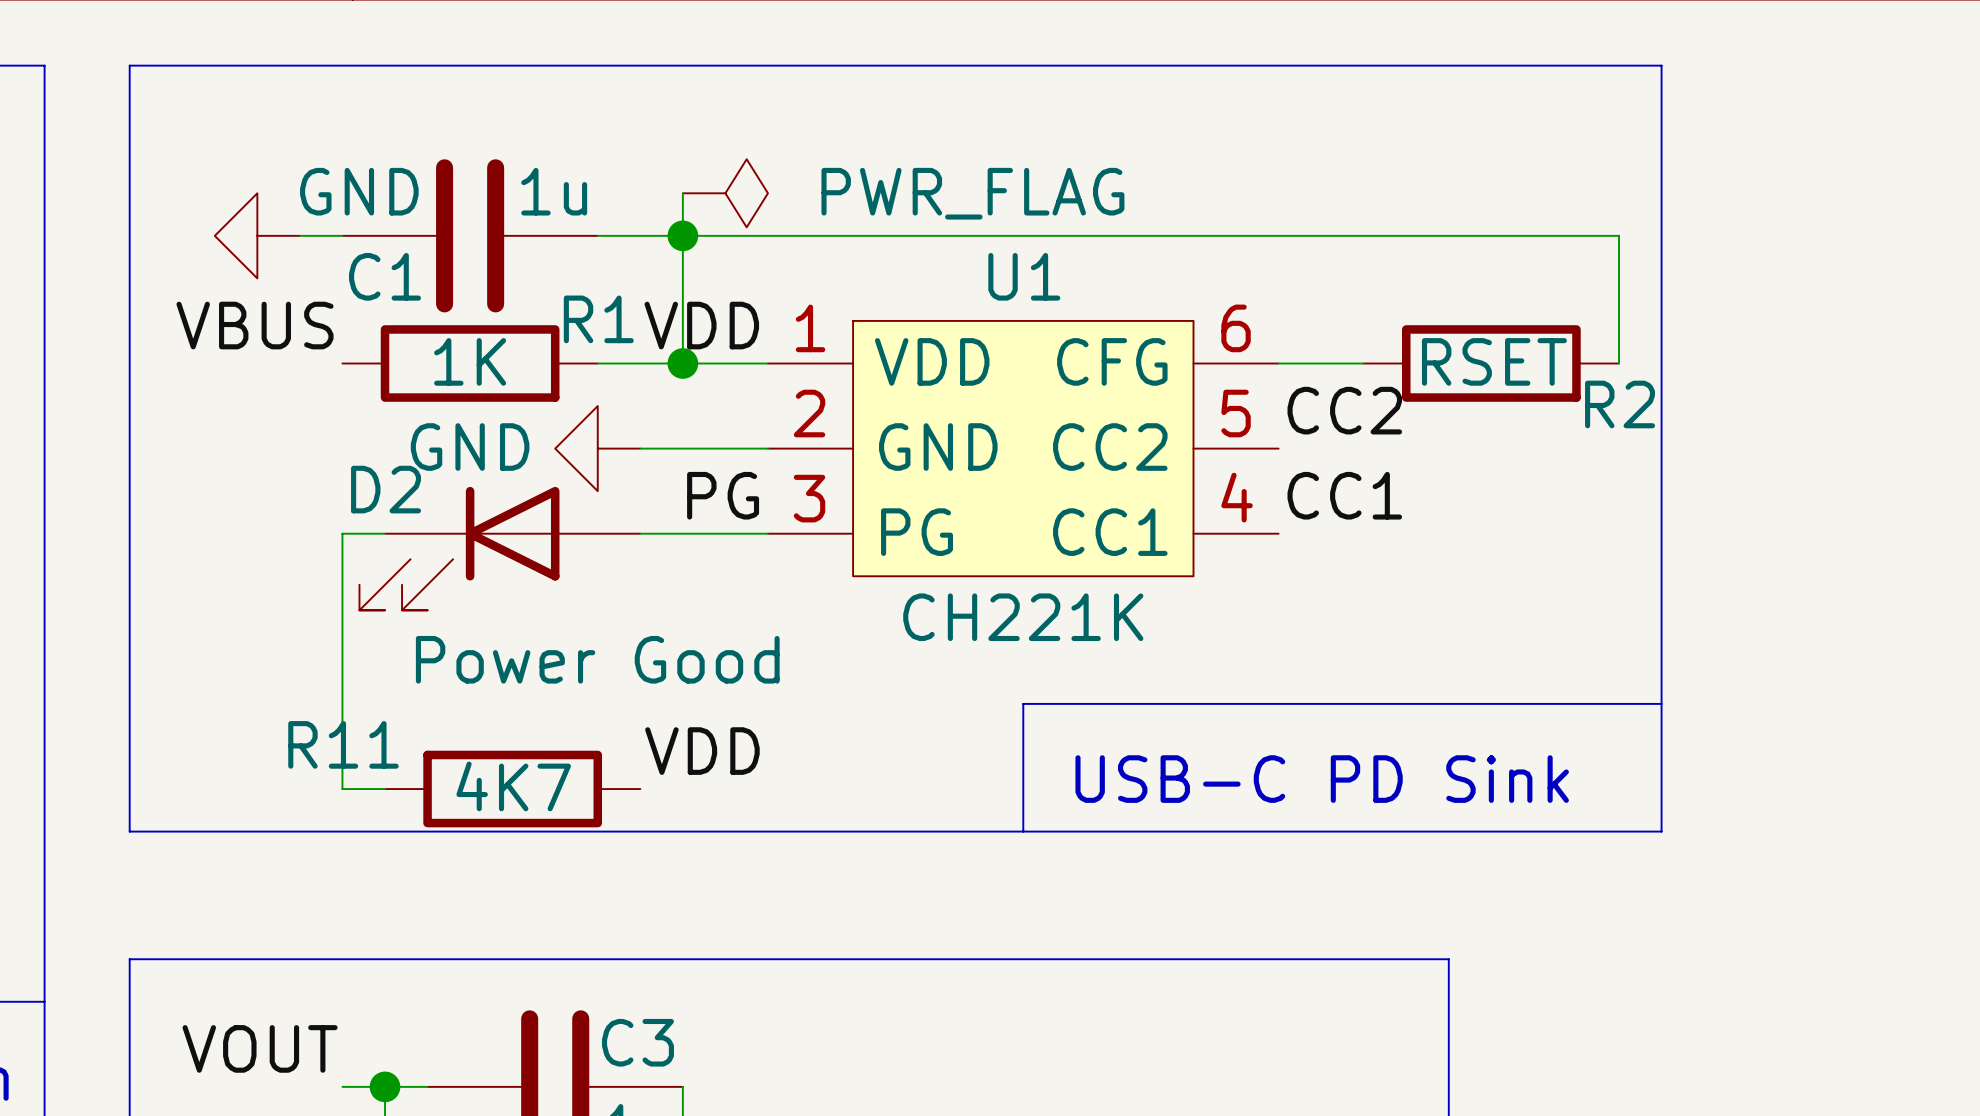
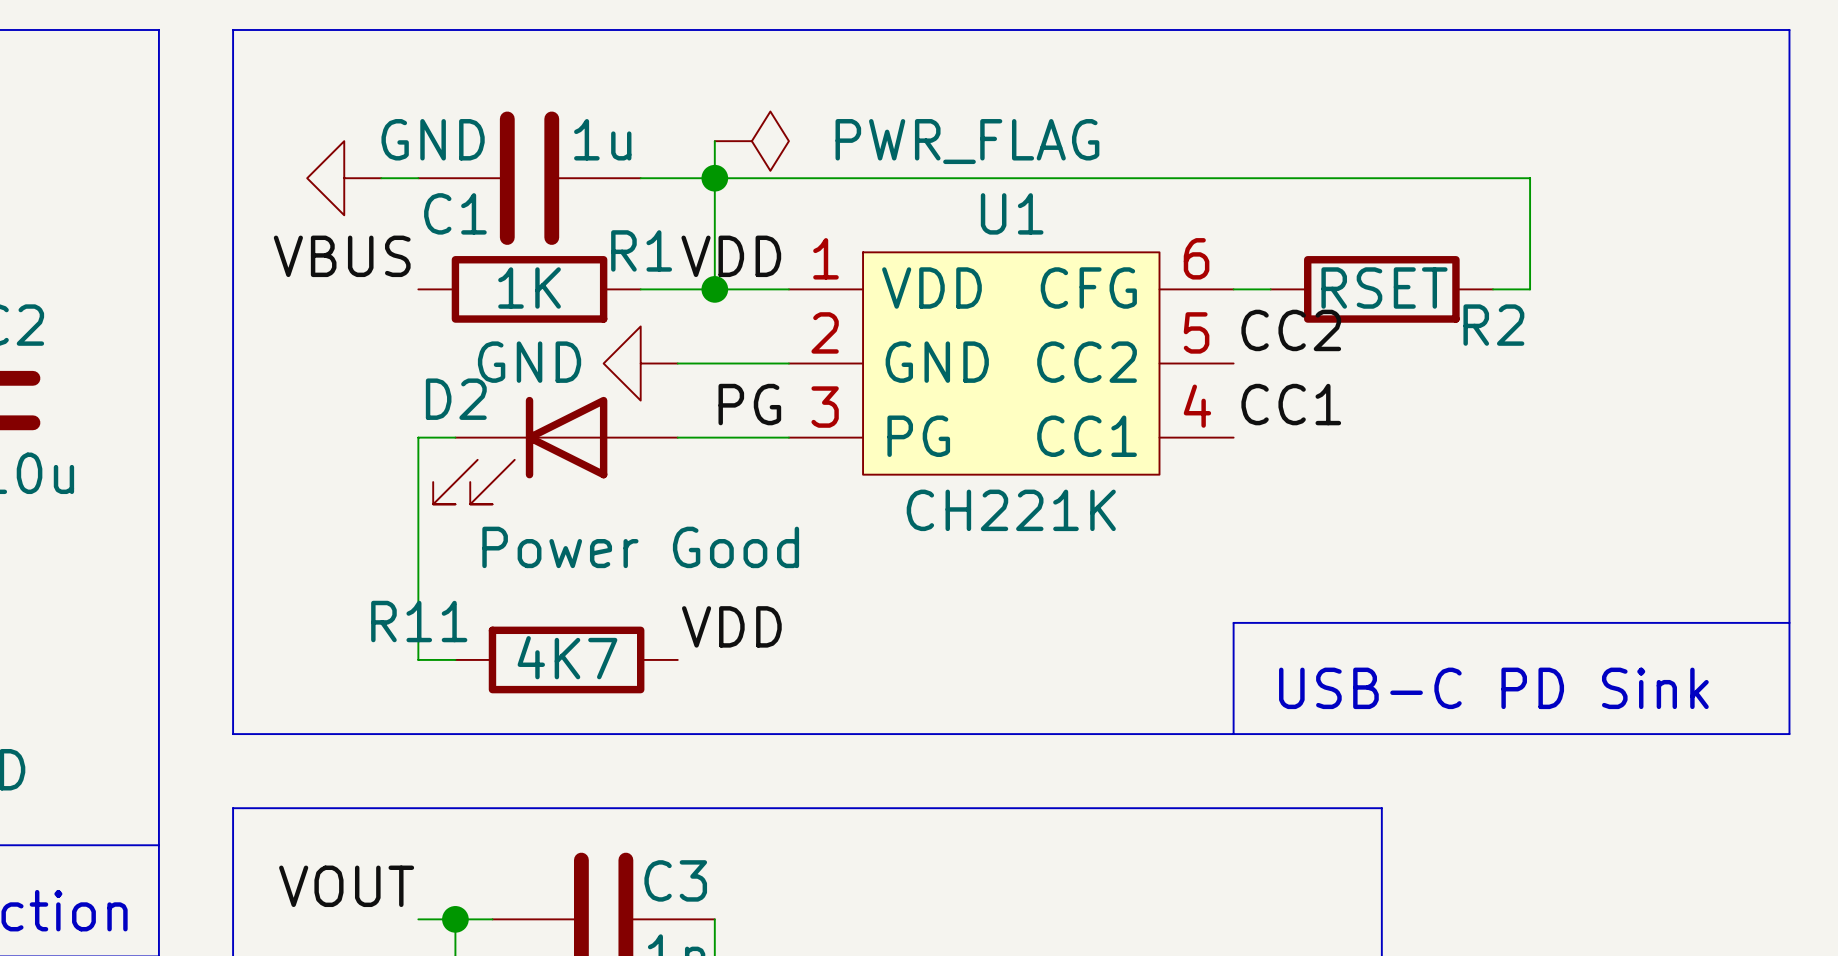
line: (1661, 65) (1661, 831) (129, 831) -> (1567, 29) (1789, 29) (1789, 734) (233, 734) (233, 697)
R2 position: (1491, 363) -> (1381, 289)
line: (1661, 703) (1023, 703) (1023, 831) -> (1789, 622) (1233, 622) (1233, 734)
text position: USB-C PD Sink (1322, 779) -> USB-C PD Sink (1493, 688)

